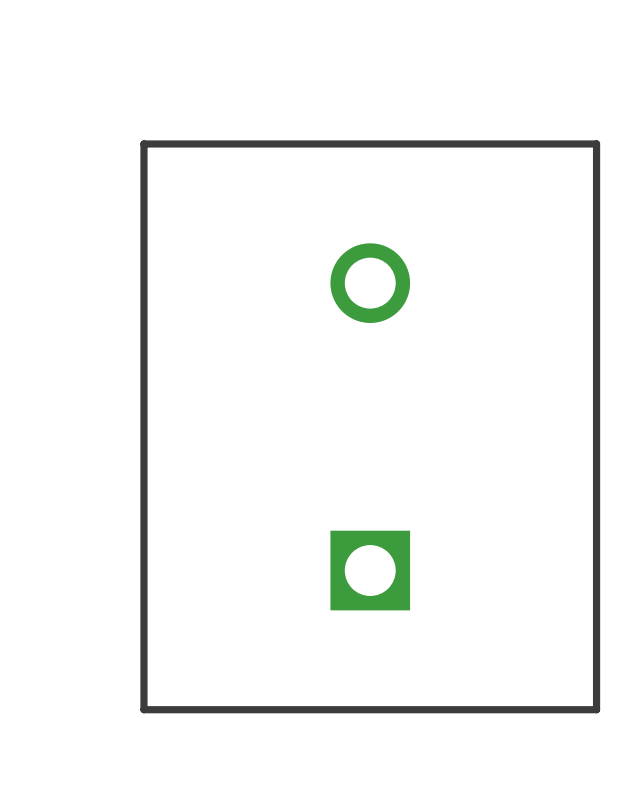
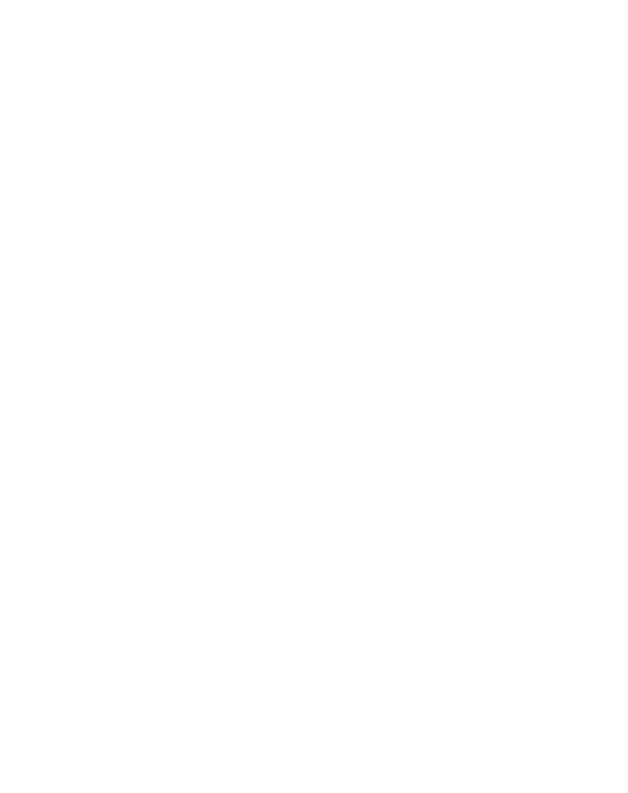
part: (370, 426) -> none

